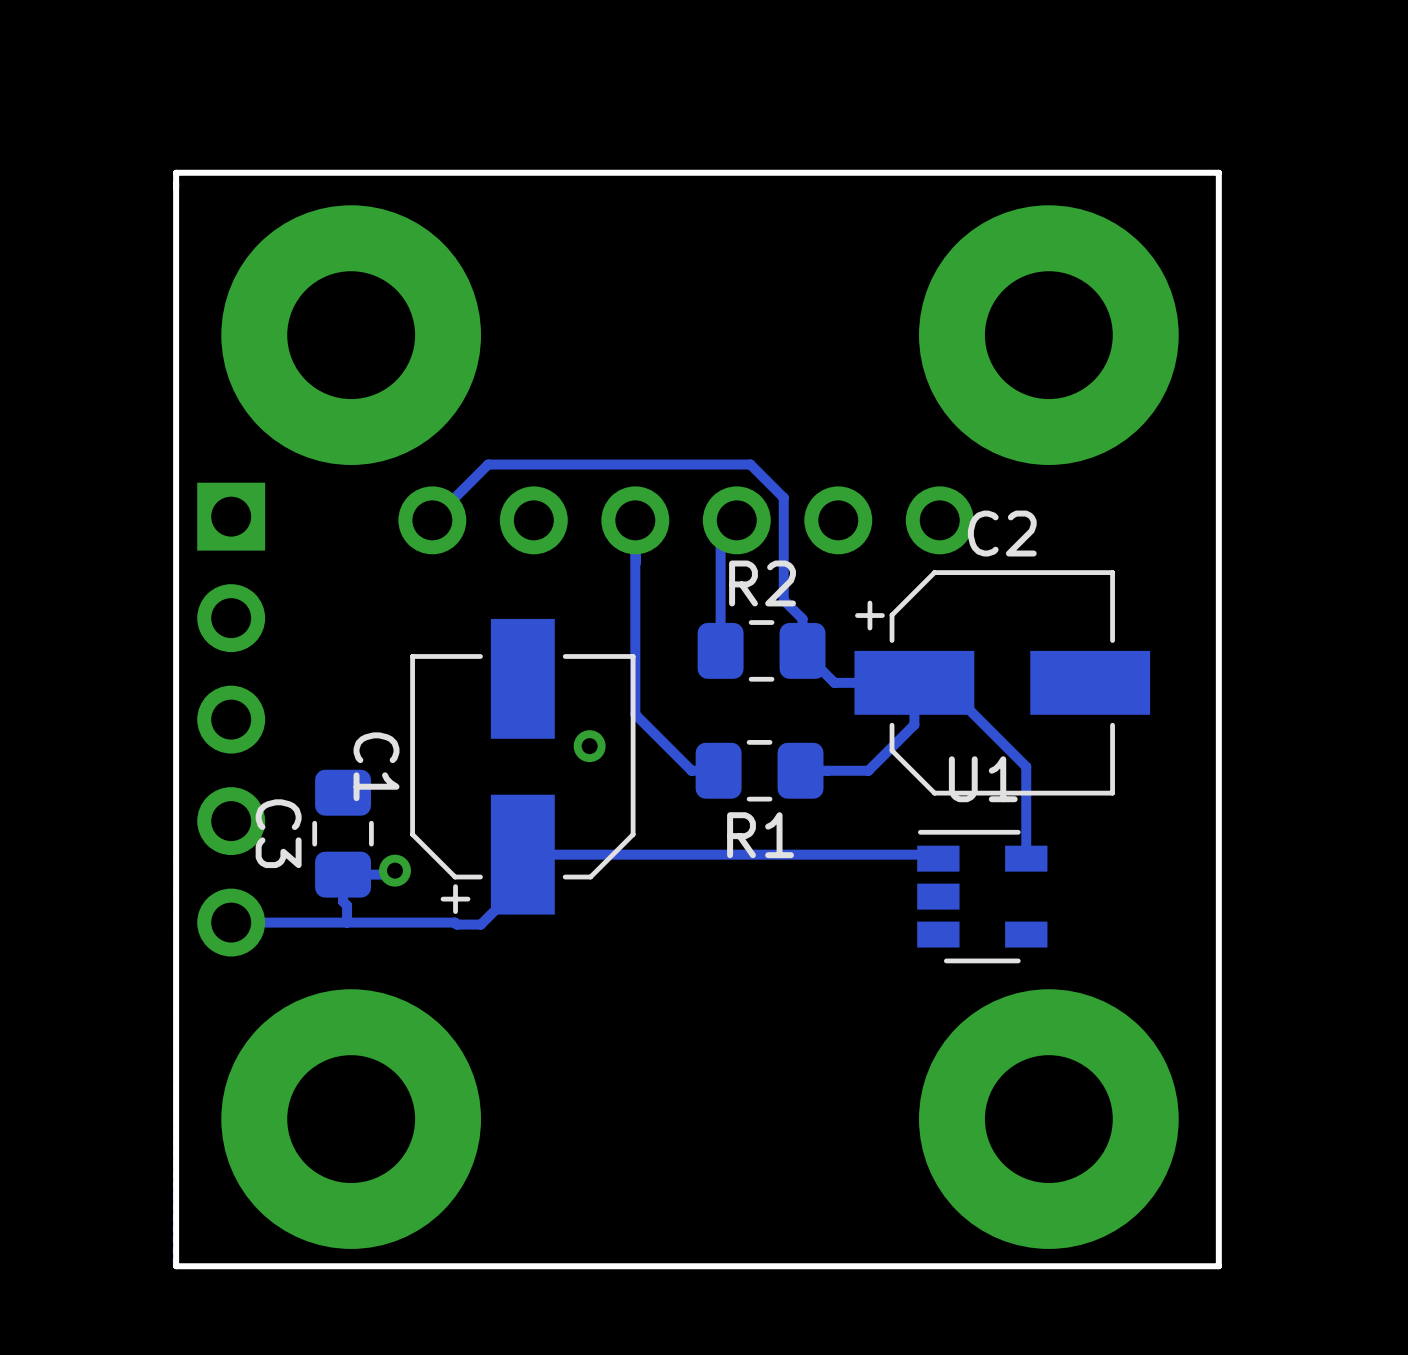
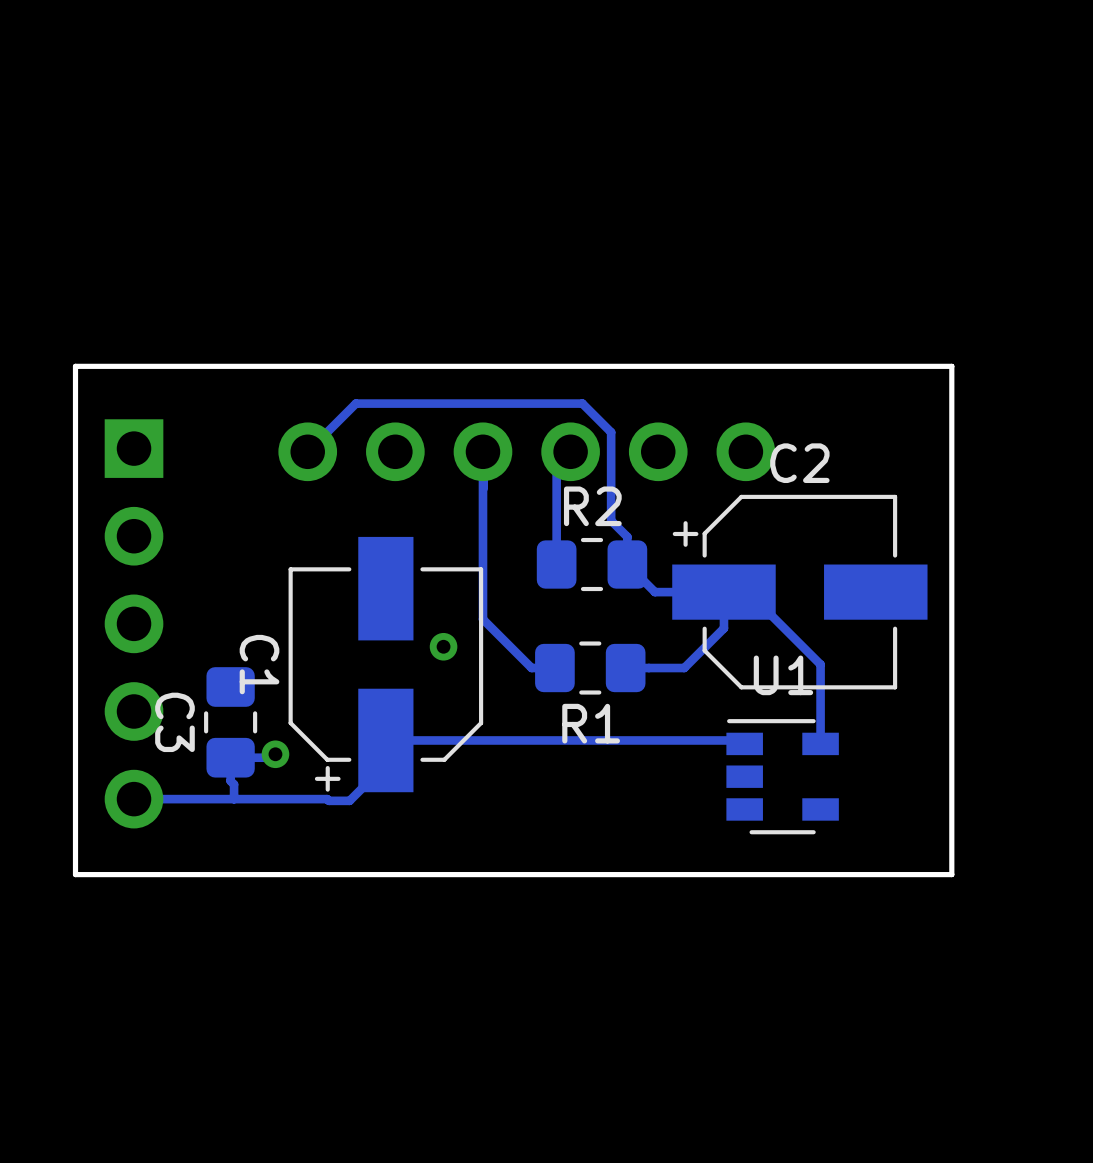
board edge: (1218, 172) (176, 172) (176, 1266) (1218, 1266) (1218, 172) -> (951, 366) (951, 874) (75, 874) (75, 366) (951, 366)
part: (351, 335) -> none
part: (1048, 335) -> none
part: (351, 1119) -> none
part: (1048, 1119) -> none

